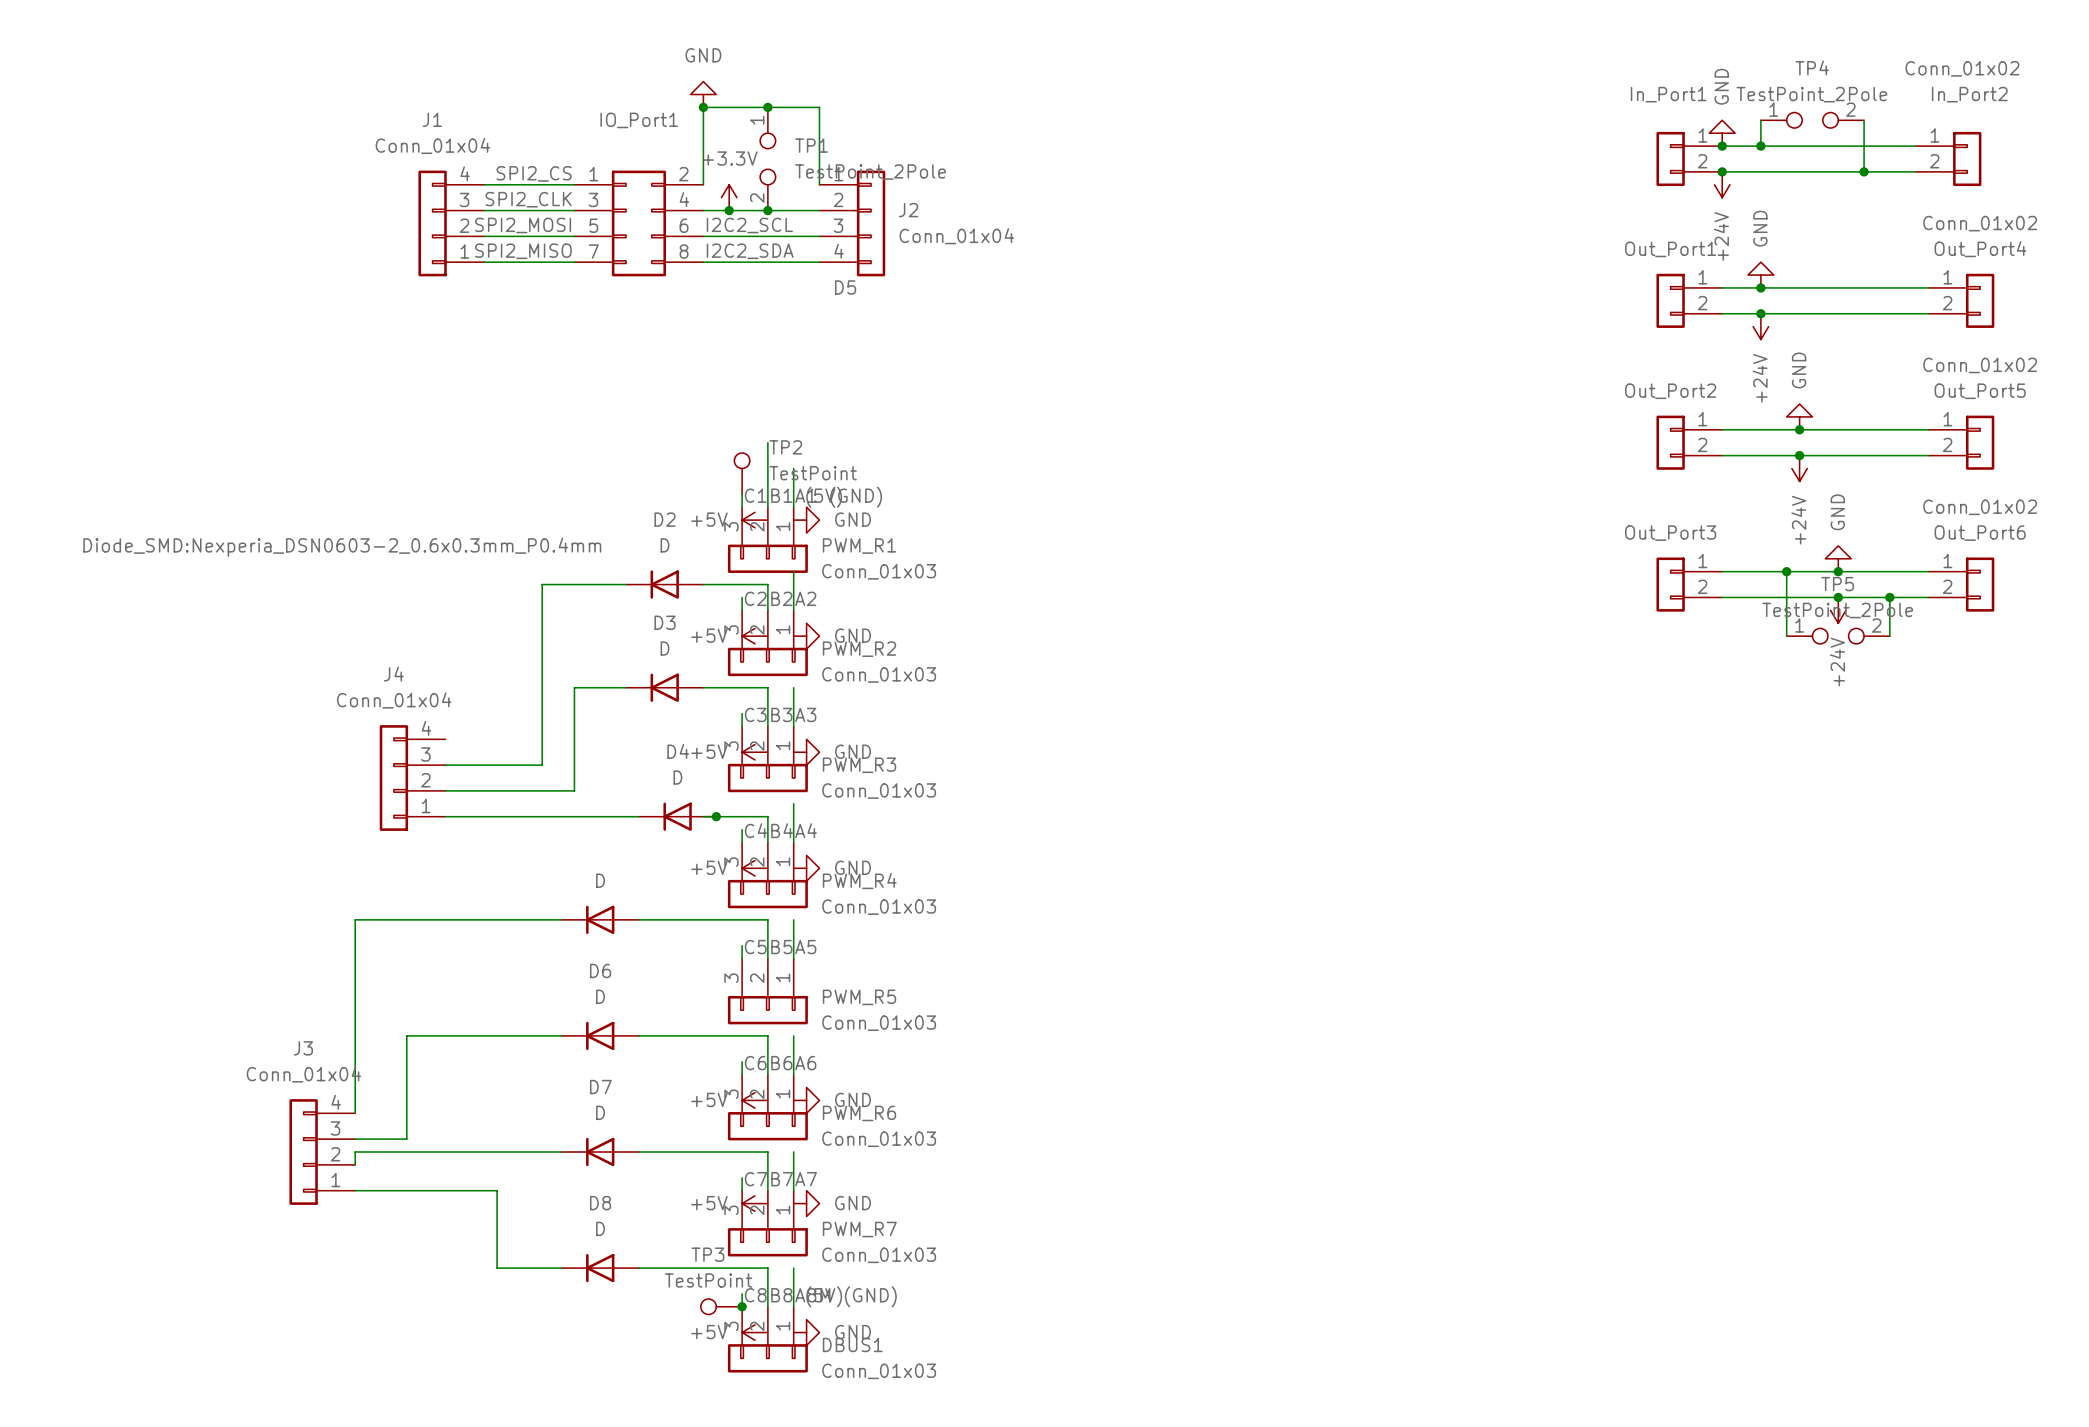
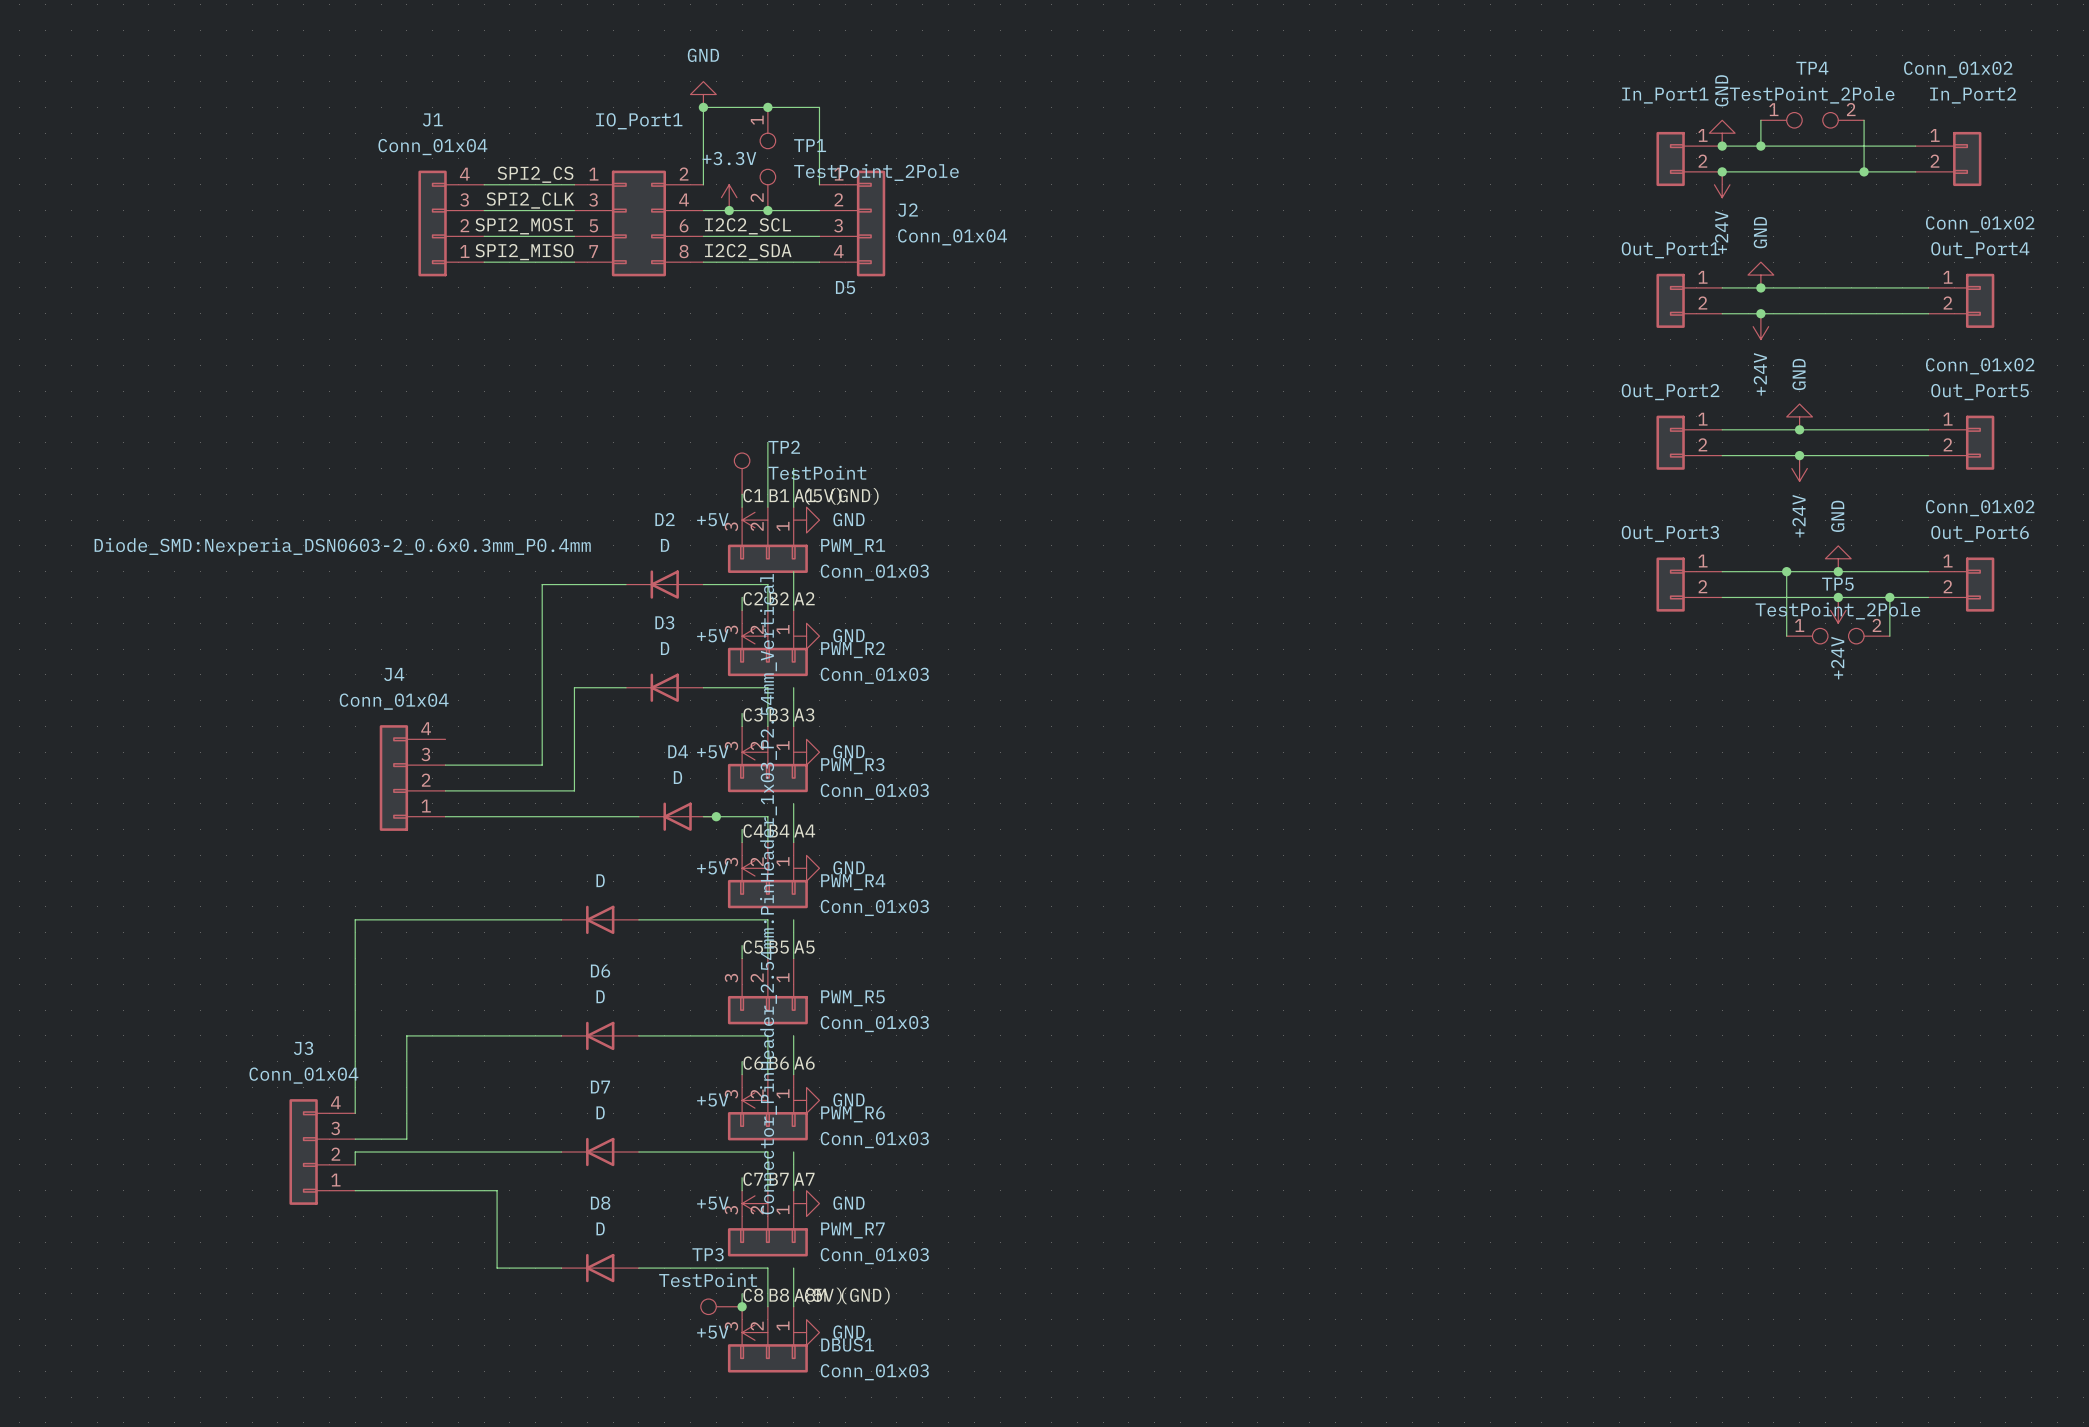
PWM_R4 text: none -> Connector_PinHeader_2.54mm:PinHeader_1x03_P2.54mm_Vertical (768, 894)

